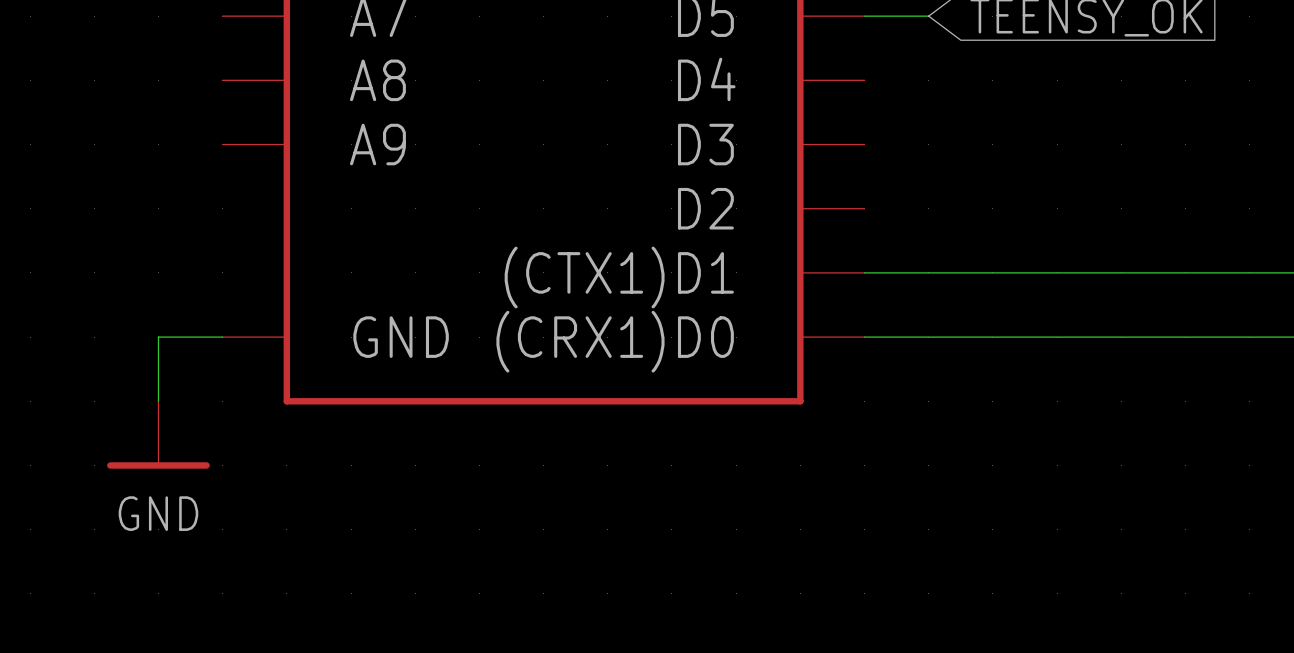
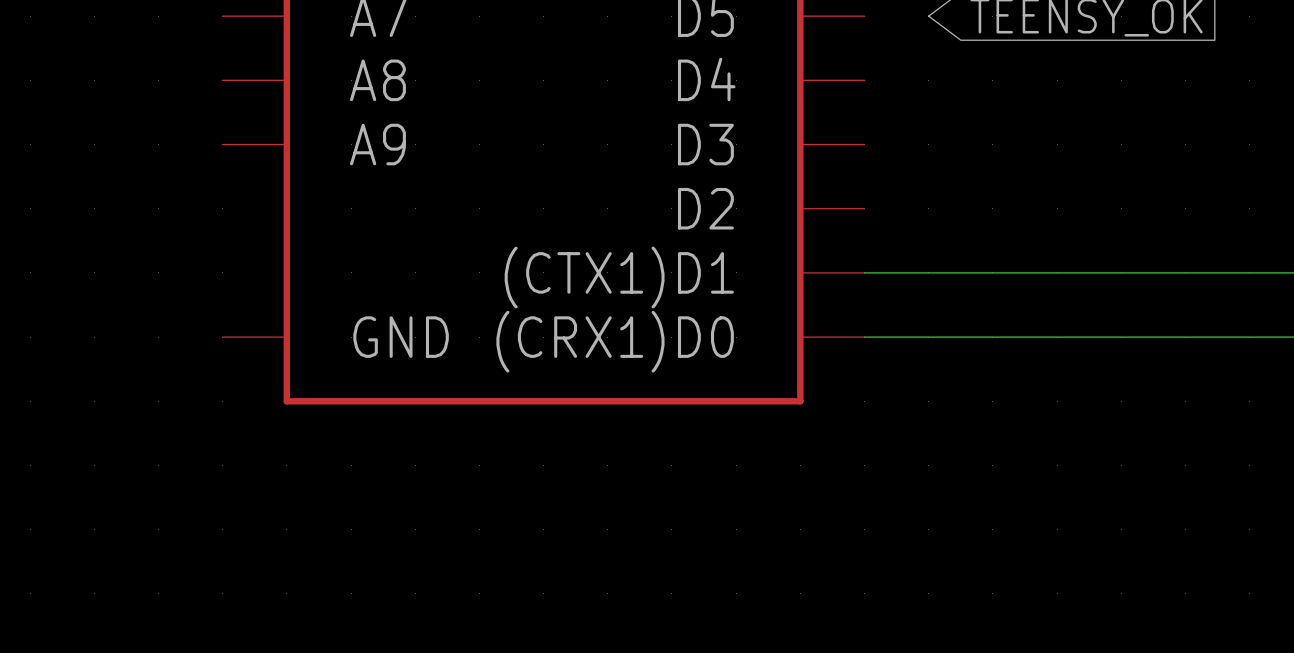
wire: (864, 16) (928, 16) -> none
wire: (222, 337) (158, 337) (158, 401) -> none
power symbol: GND (158, 434) -> none

